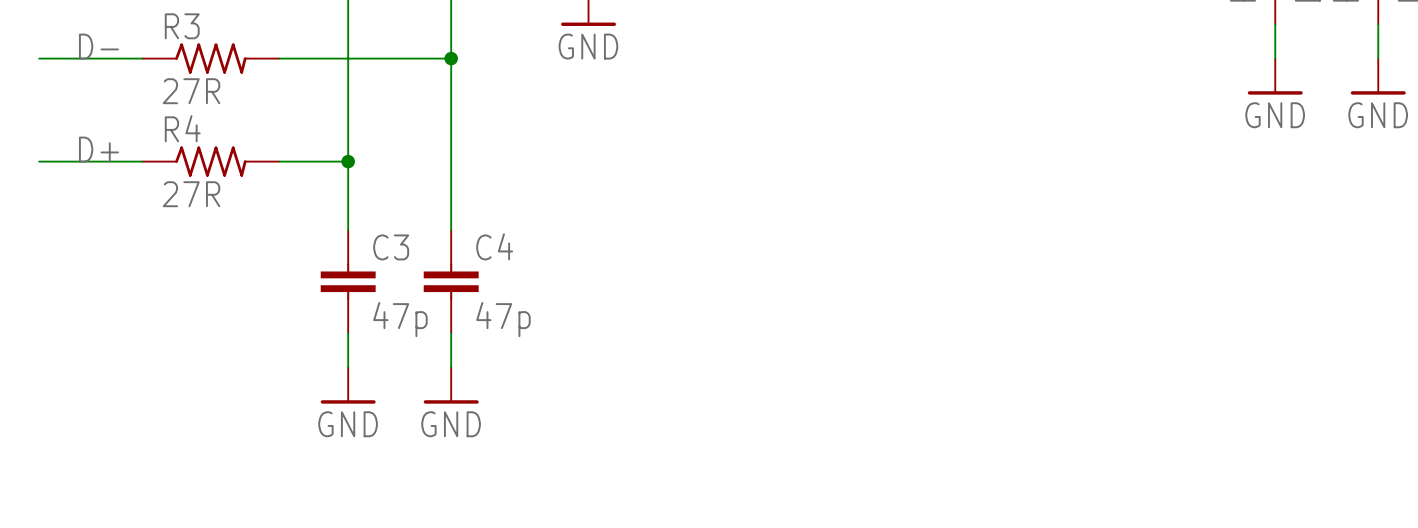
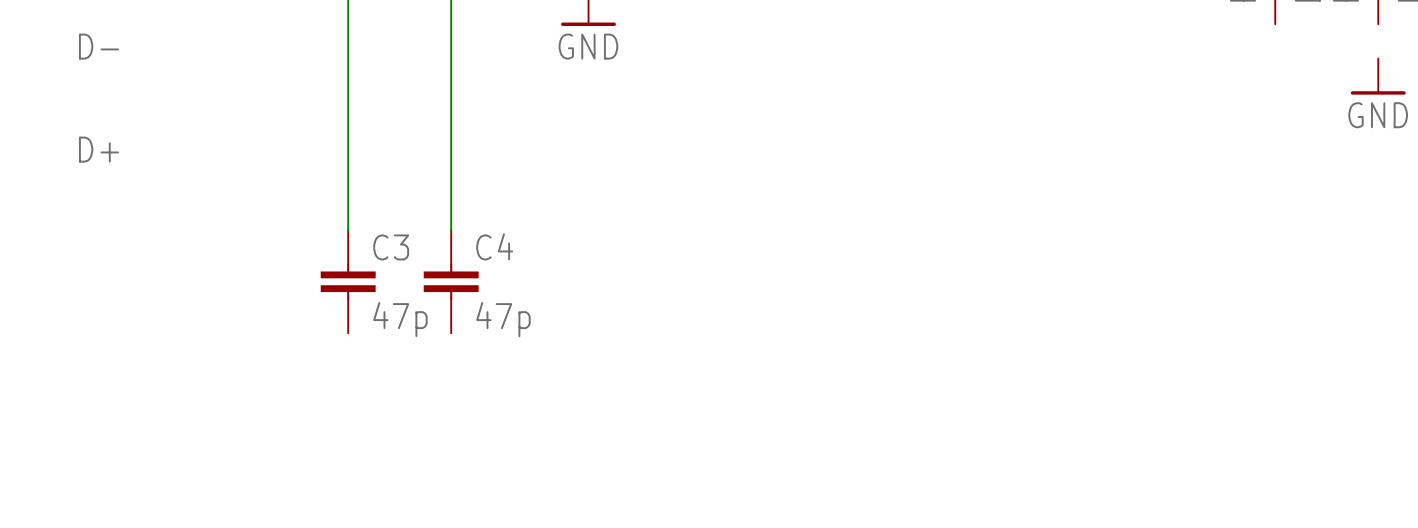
wire: (1275, 24) (1275, 58) -> none
wire: (1378, 24) (1378, 58) -> none
wire: (39, 58) (142, 58) -> none
R3: 27R (210, 58) -> none
wire: (279, 58) (451, 58) -> none
junction: (451, 58) -> none
power symbol: GND (1275, 76) -> none
wire: (39, 161) (142, 161) -> none
R4: 27R (210, 161) -> none
wire: (279, 161) (348, 161) -> none
junction: (348, 161) -> none
wire: (348, 333) (348, 367) -> none
wire: (451, 333) (451, 367) -> none
power symbol: GND (348, 385) -> none
power symbol: GND (451, 385) -> none

